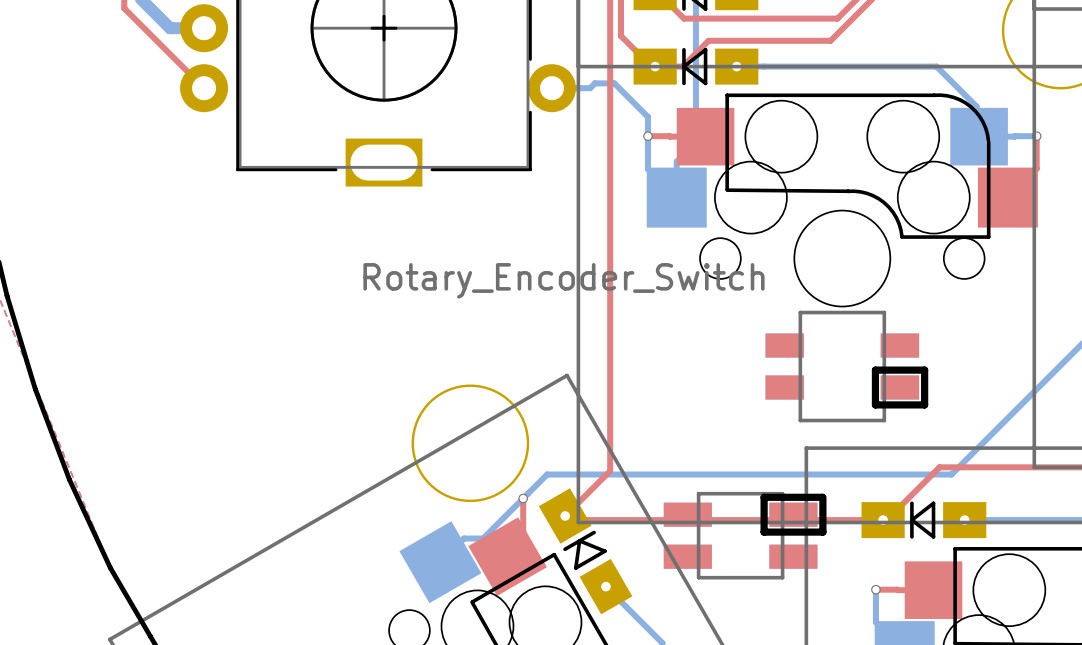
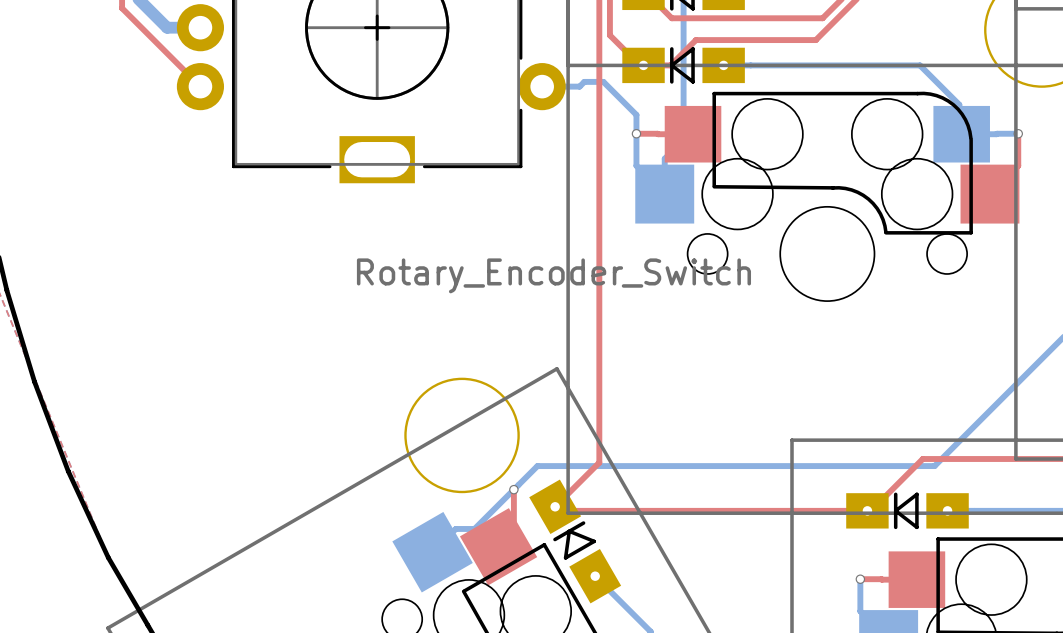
part: (846, 366) -> none
part: (745, 535) -> none

